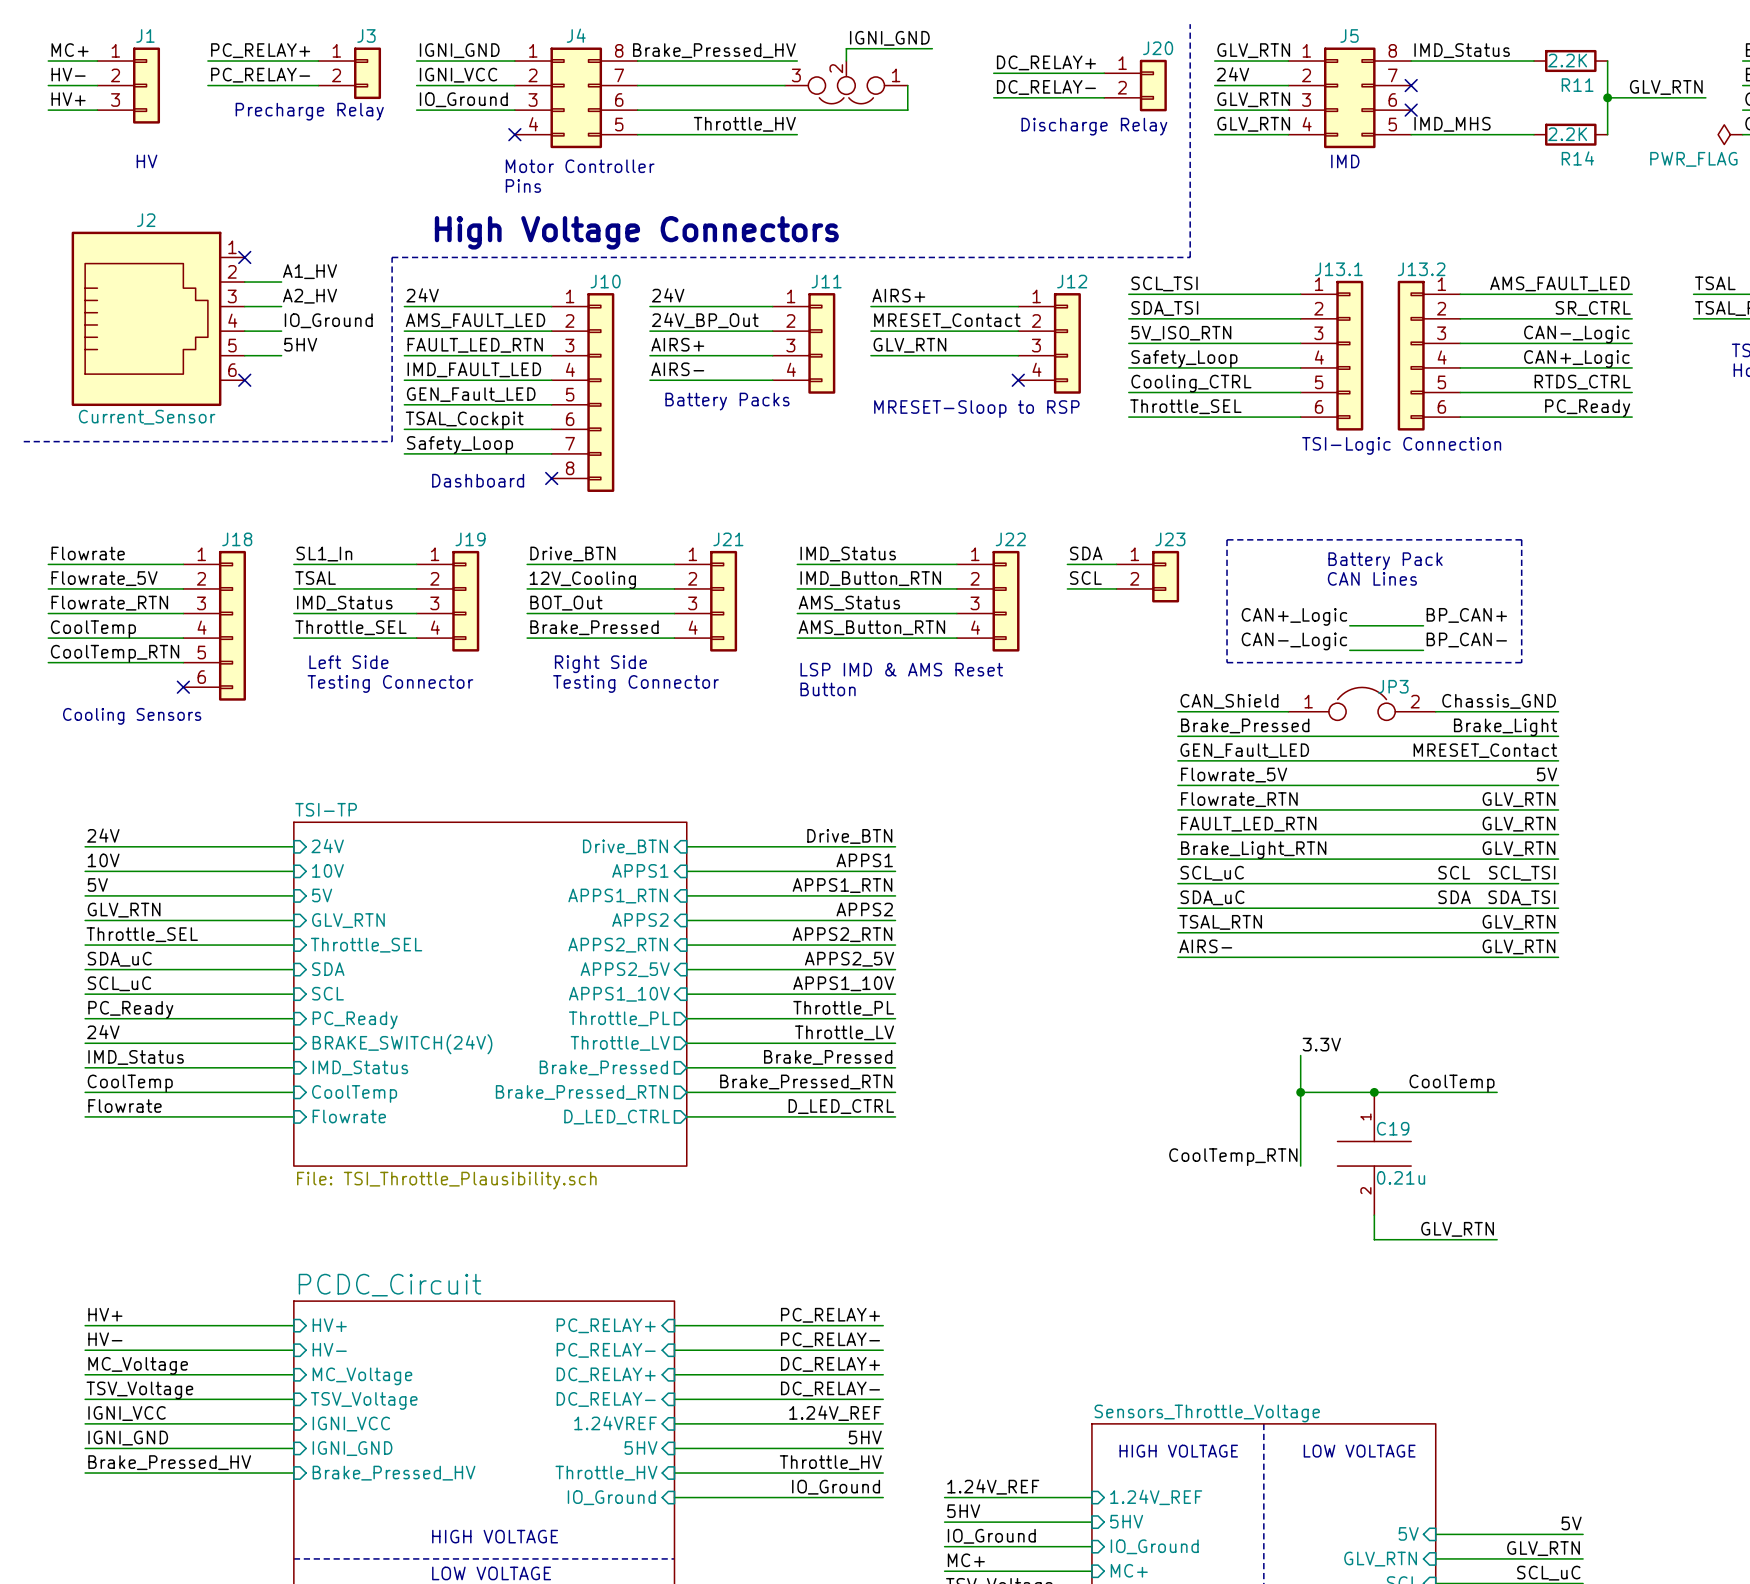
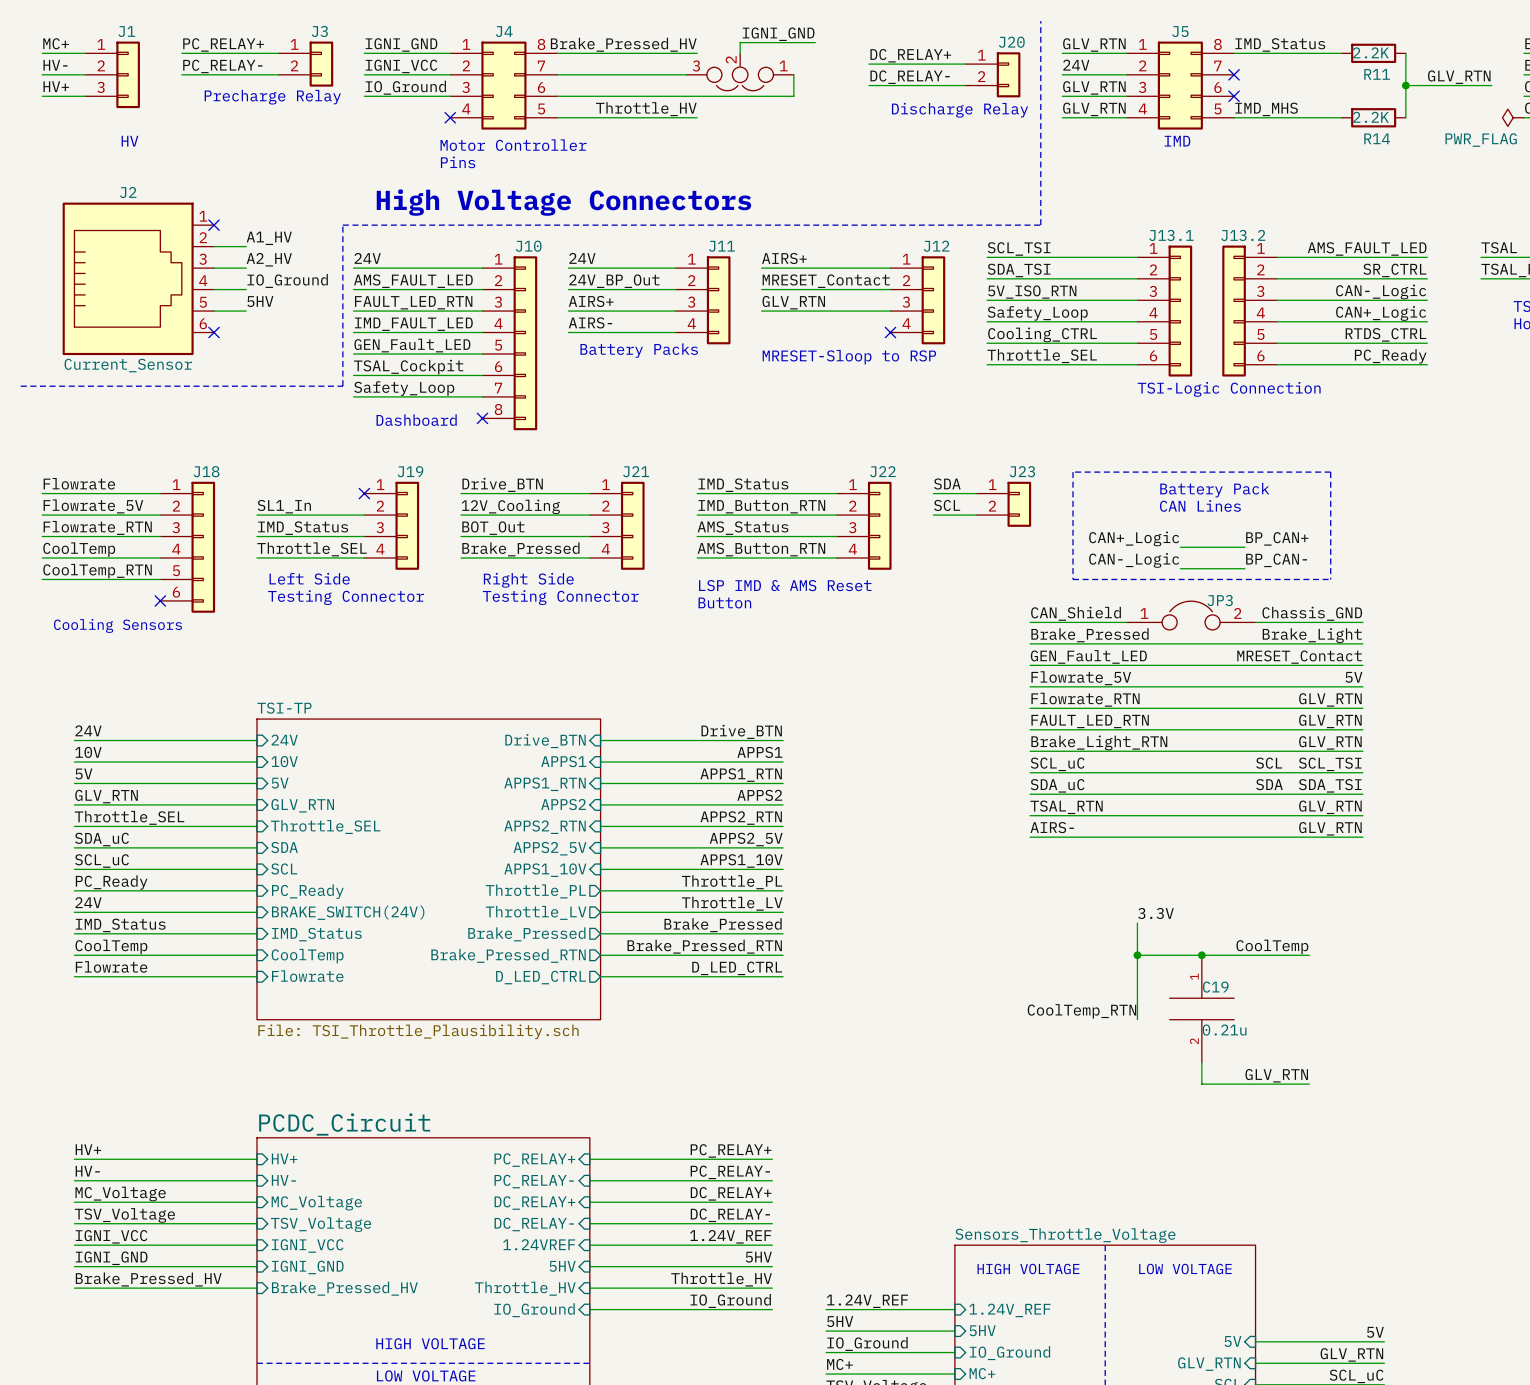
label: SL1_In (324, 554) -> none
wire: (293, 564) (416, 564) -> none
no-connect mark: none -> (364, 493)
label: TSAL (315, 578) -> SL1_In (284, 506)

